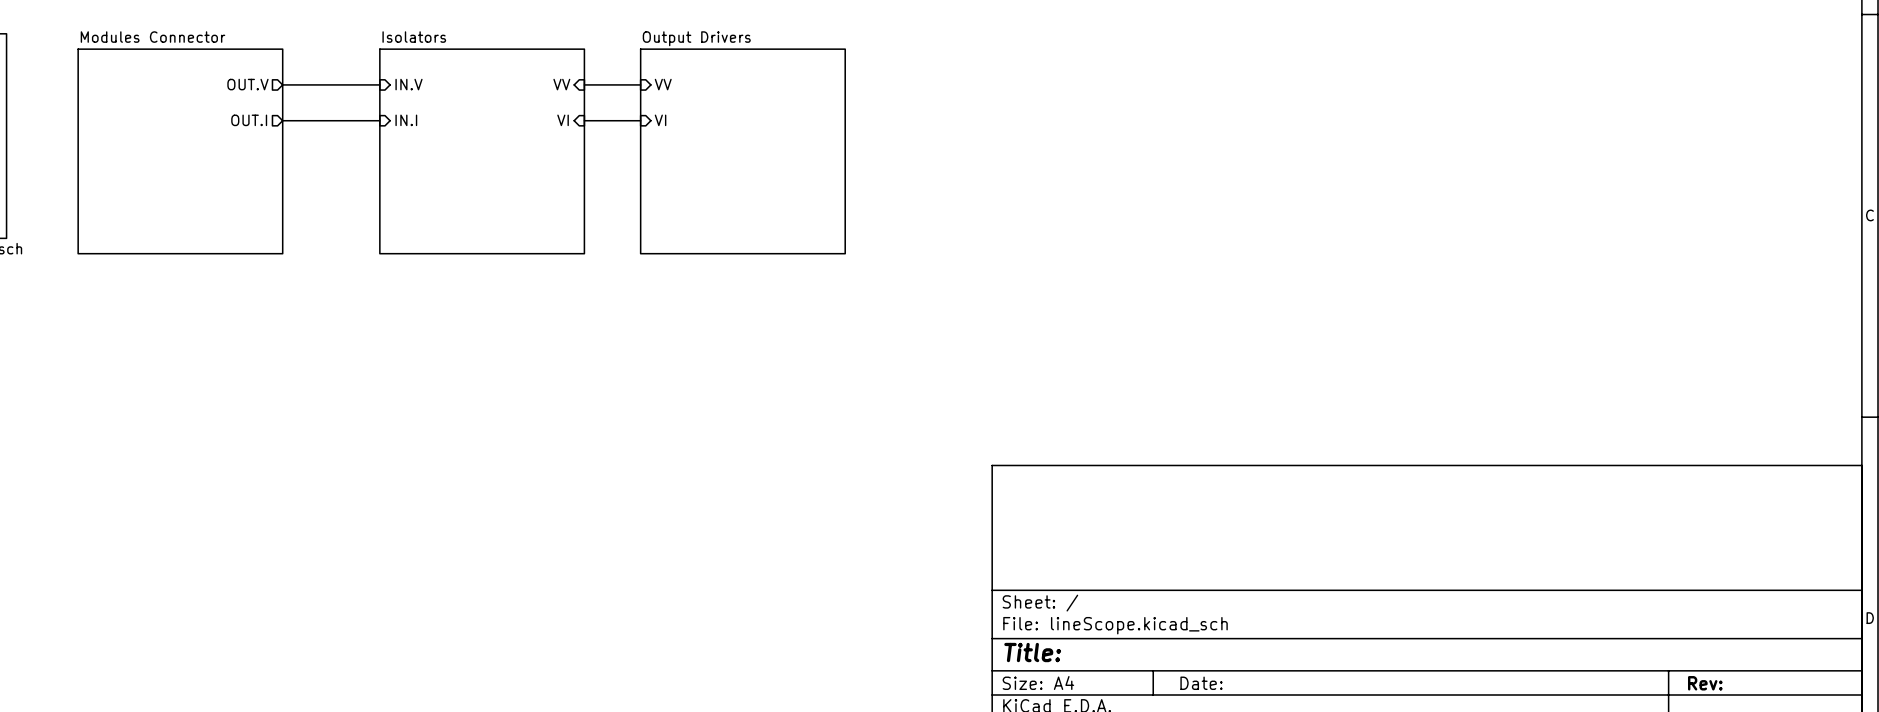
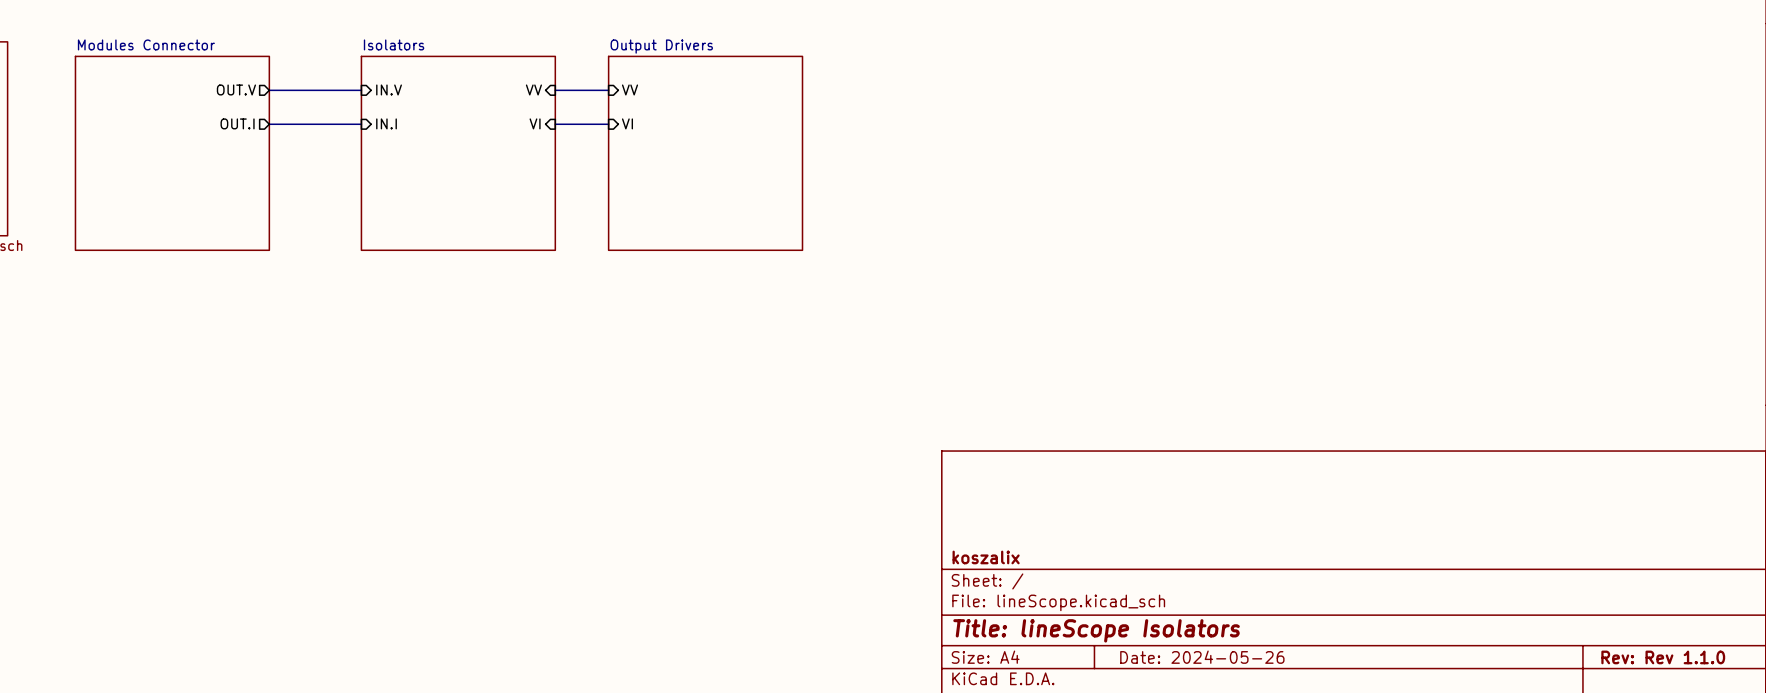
title block: none -> koszalix (986, 557)
title block: Title: (1032, 652) -> Title: lineScope Isolators (1096, 630)
title block: Date: (1201, 683) -> Date: 2024-05-26 (1202, 657)
title block: Rev: (1705, 683) -> Rev: Rev 1.1.0 (1663, 657)

